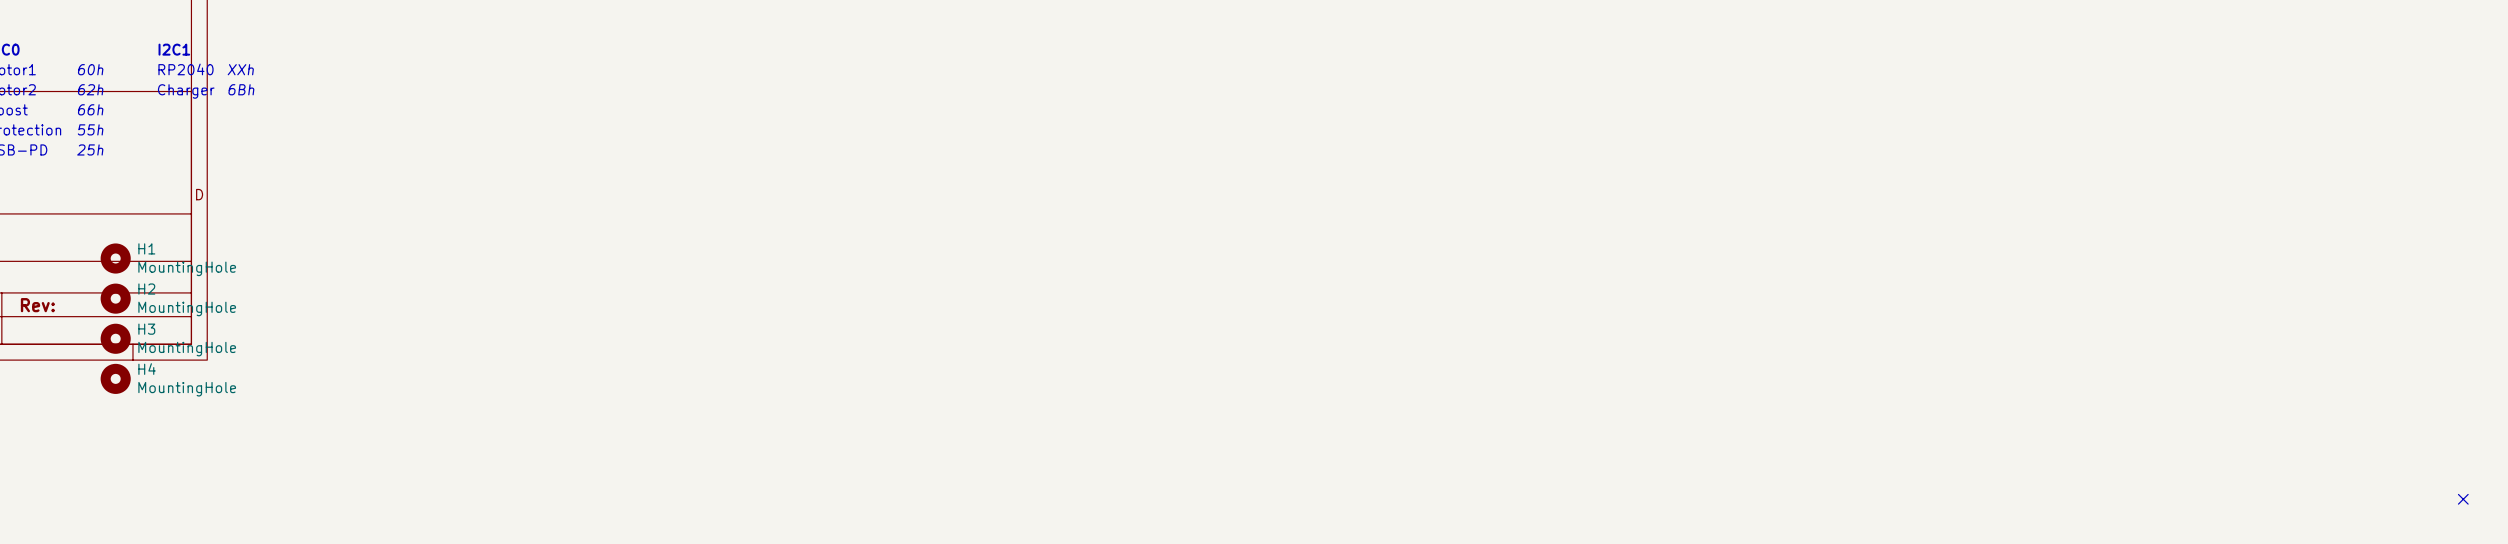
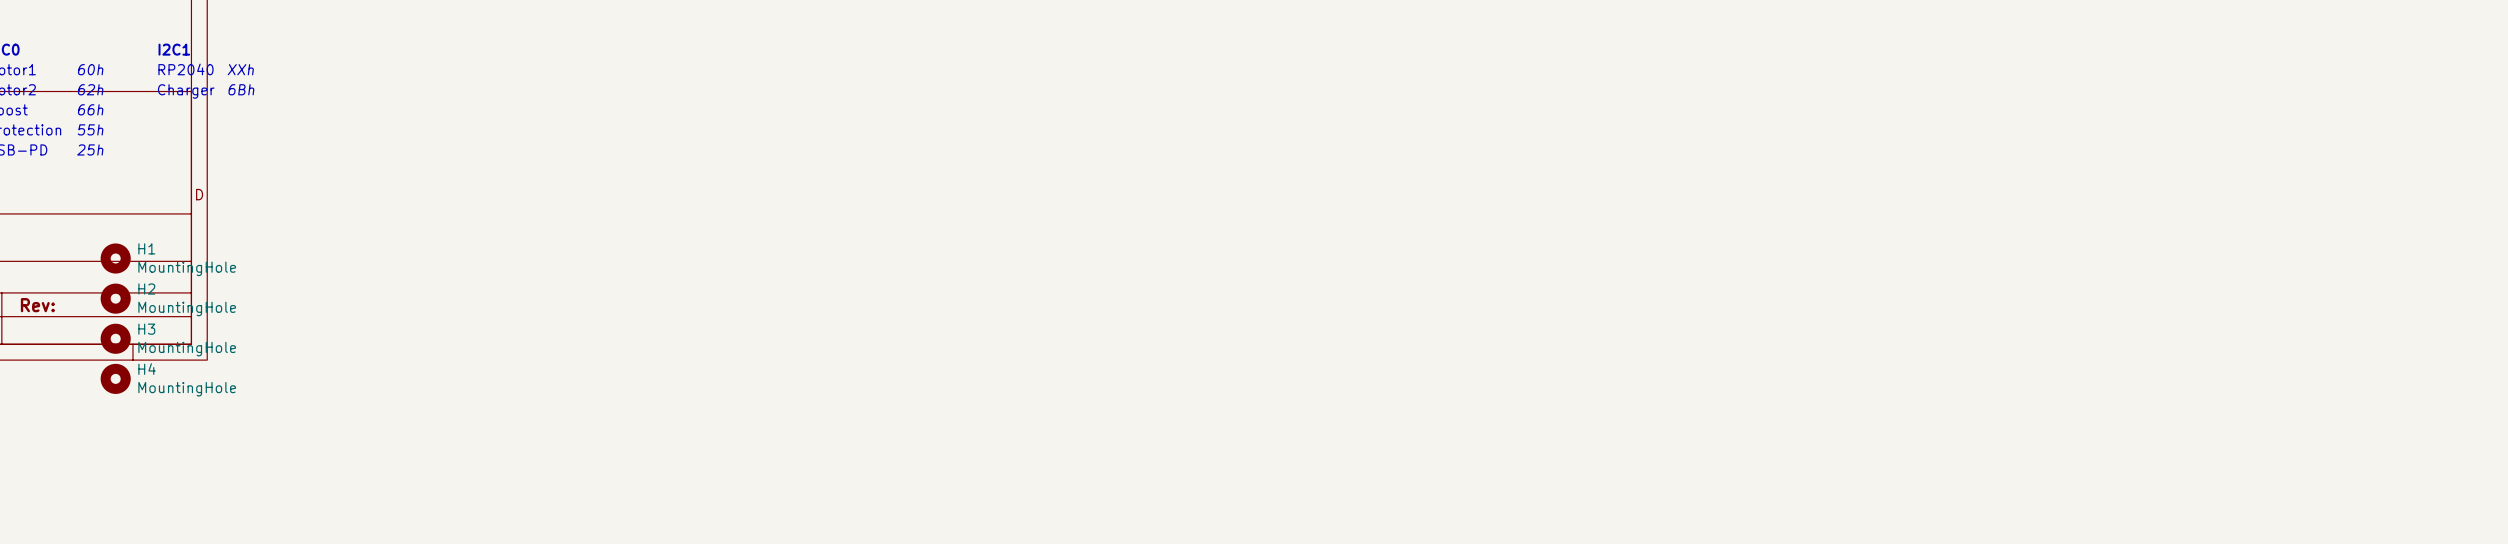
no-connect mark: (2463, 499) -> none

